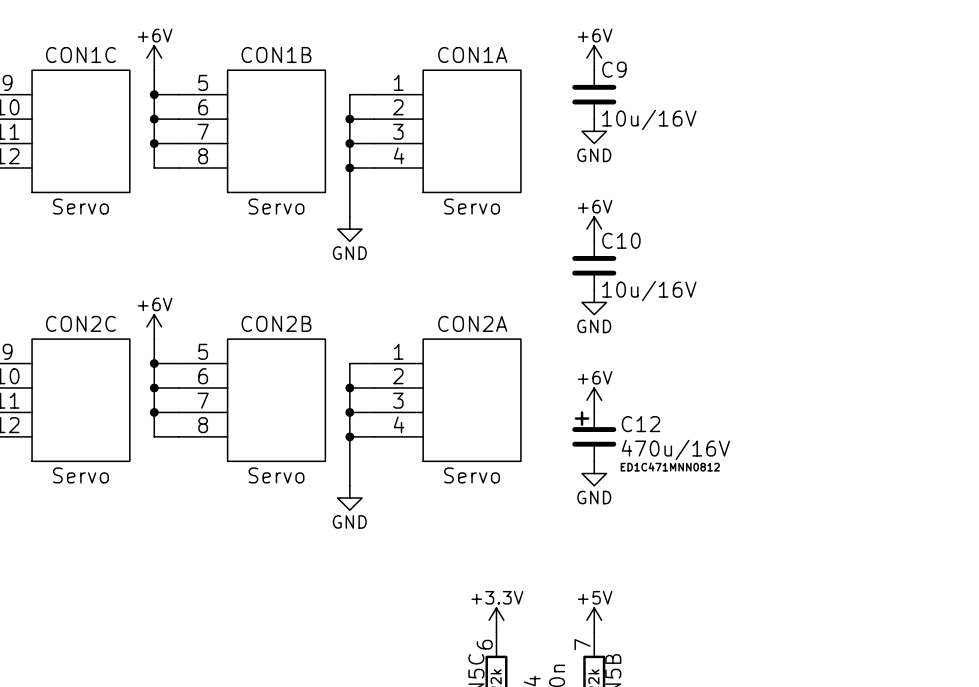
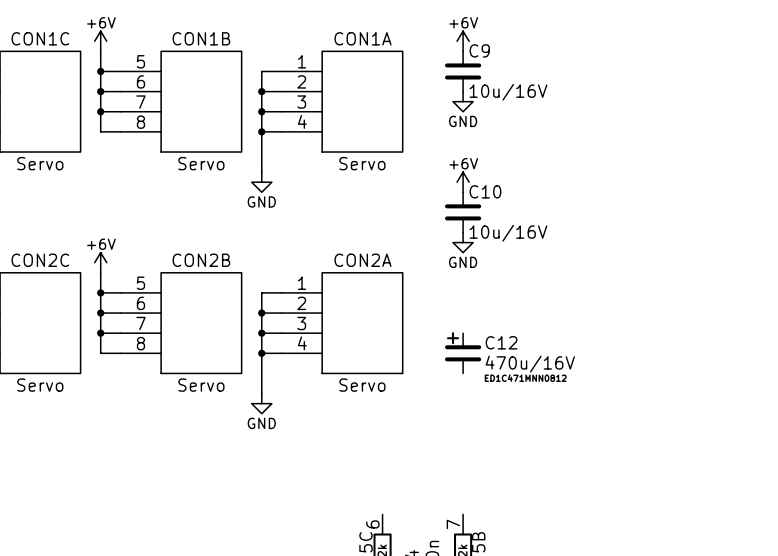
power symbol: +6V (594, 400) -> none
power symbol: GND (594, 473) -> none
power symbol: +3.3V (496, 620) -> none
power symbol: +5V (594, 620) -> none

